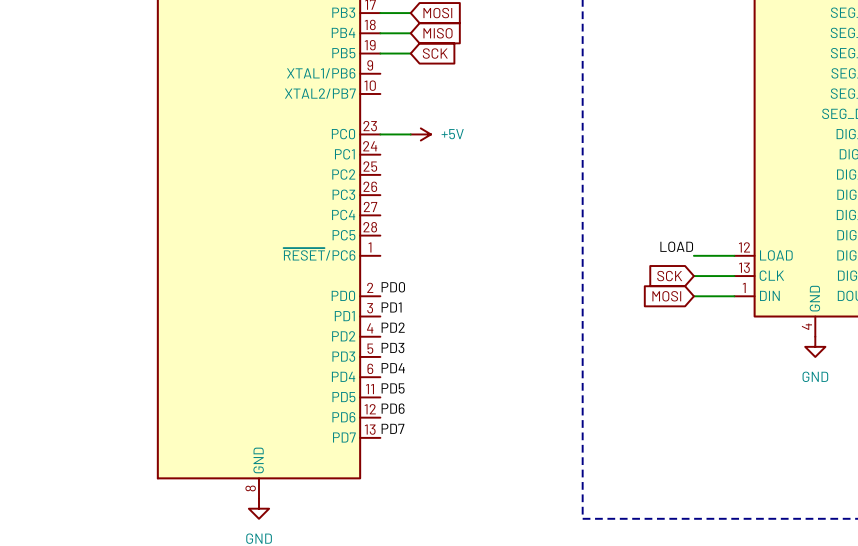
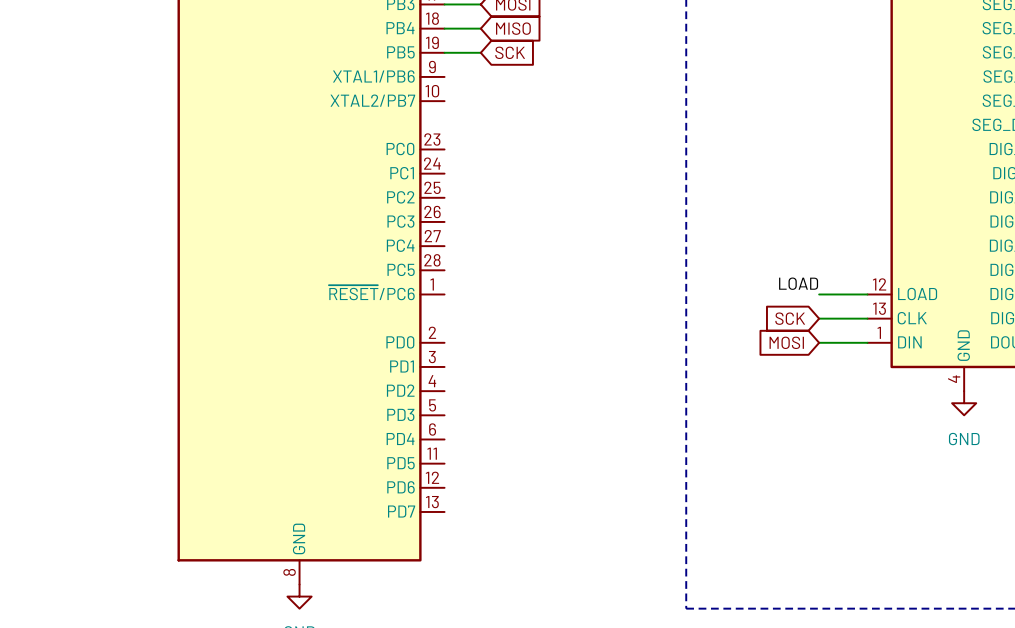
wire: (380, 134) (410, 134) -> none
power symbol: +5V (420, 134) -> none
label: PD0 (393, 287) -> none
label: PD1 (391, 307) -> none
label: PD2 (393, 327) -> none
label: PD3 (392, 348) -> none
label: PD4 (393, 368) -> none
label: PD5 (393, 388) -> none
label: PD6 (393, 408) -> none
label: PD7 (393, 428) -> none

